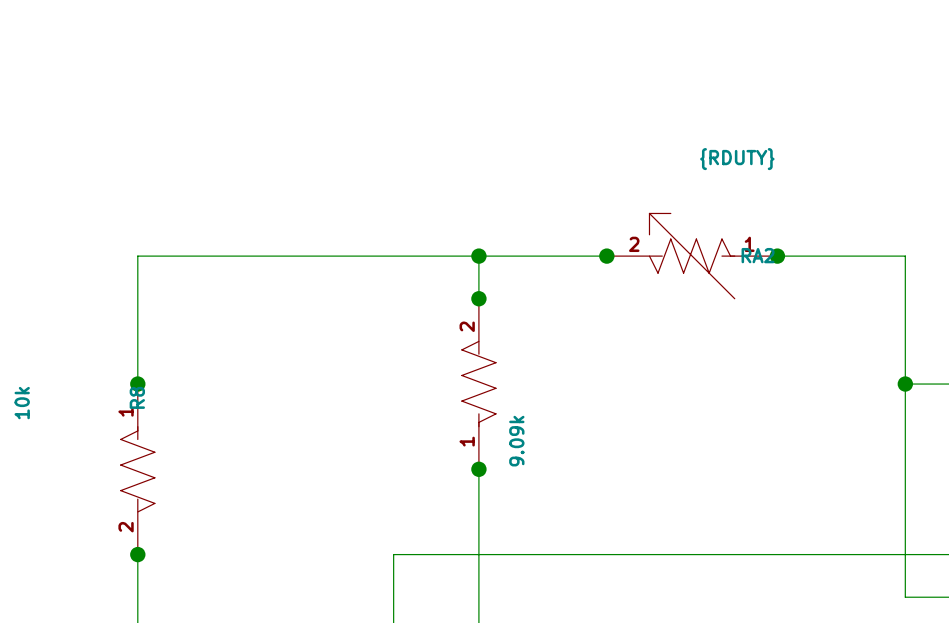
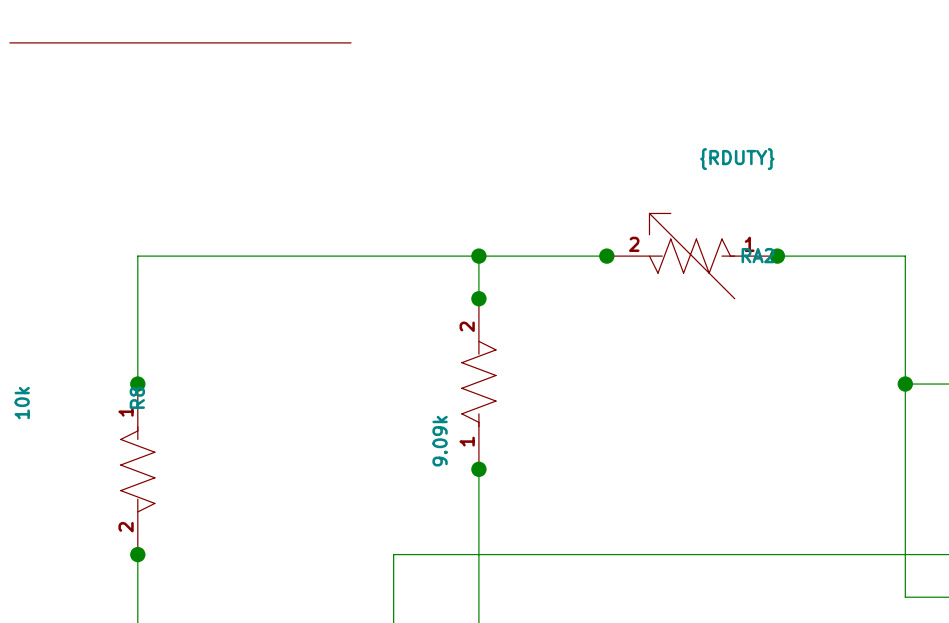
part: none -> (180, 42)
part flip: as is (478, 384) -> left-right (478, 384)

